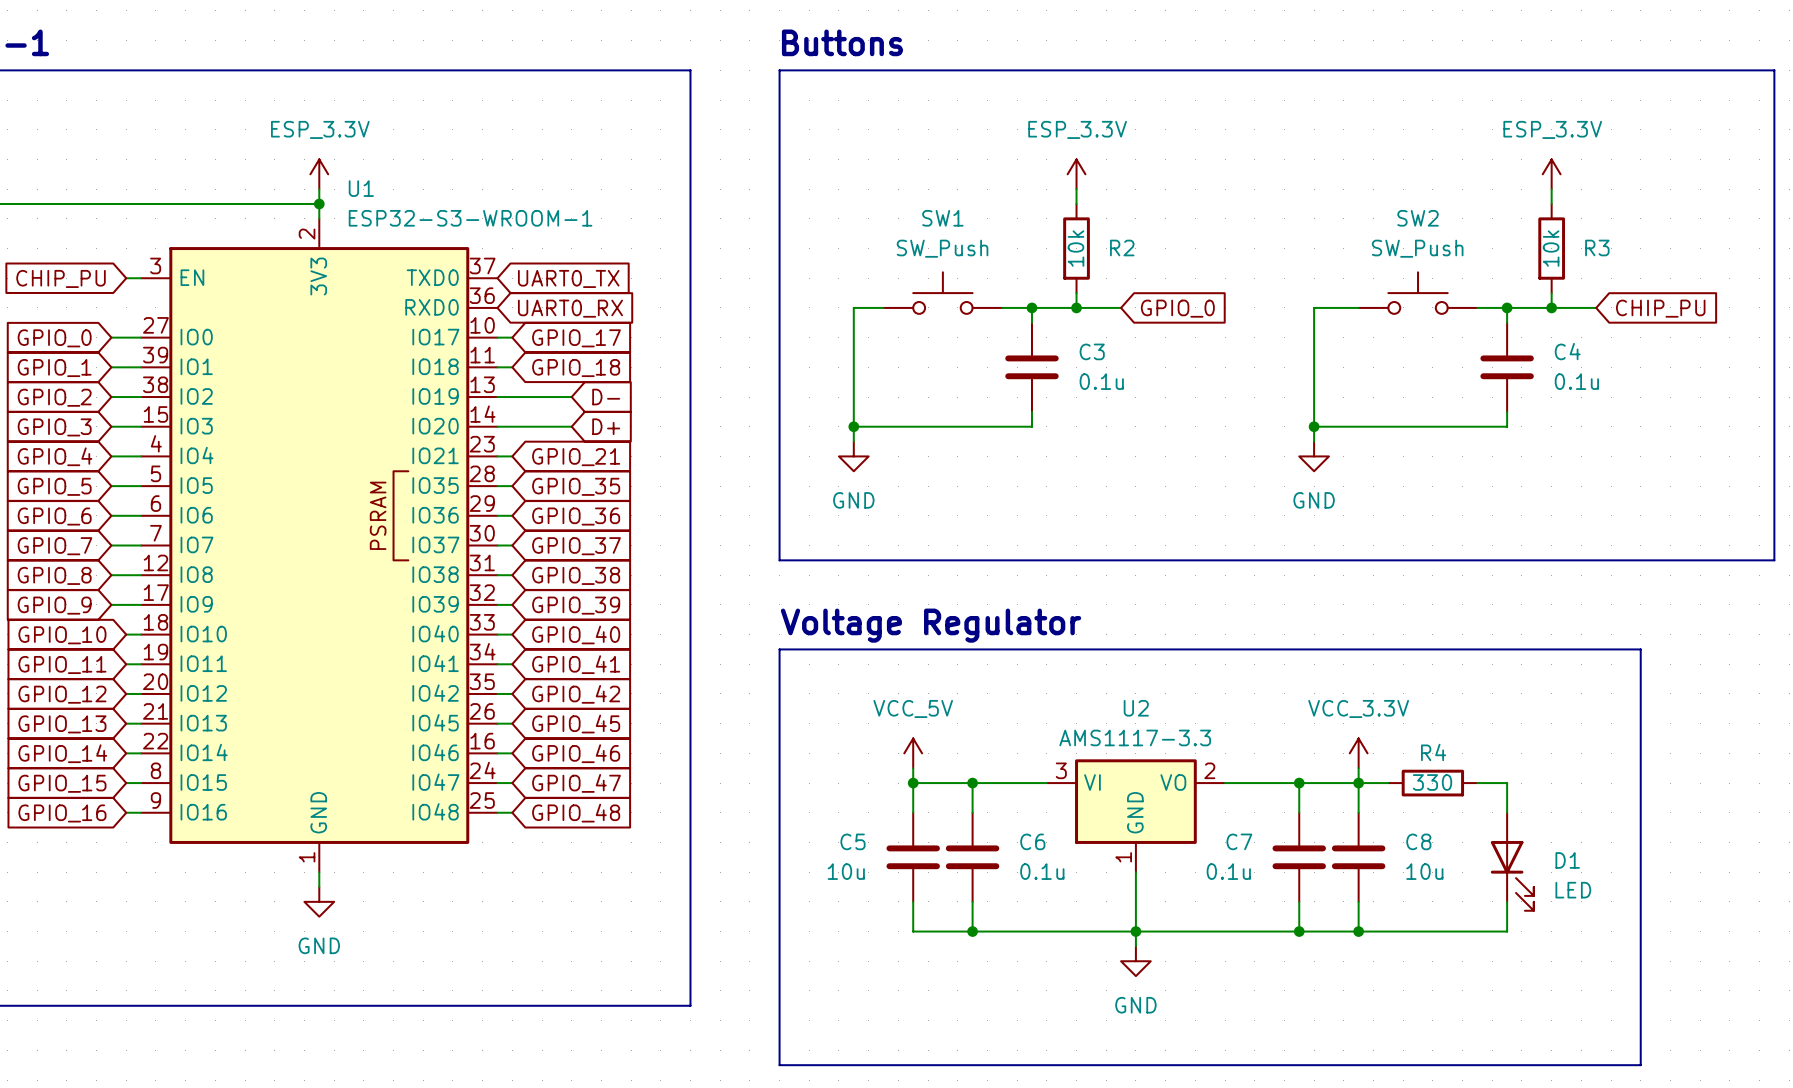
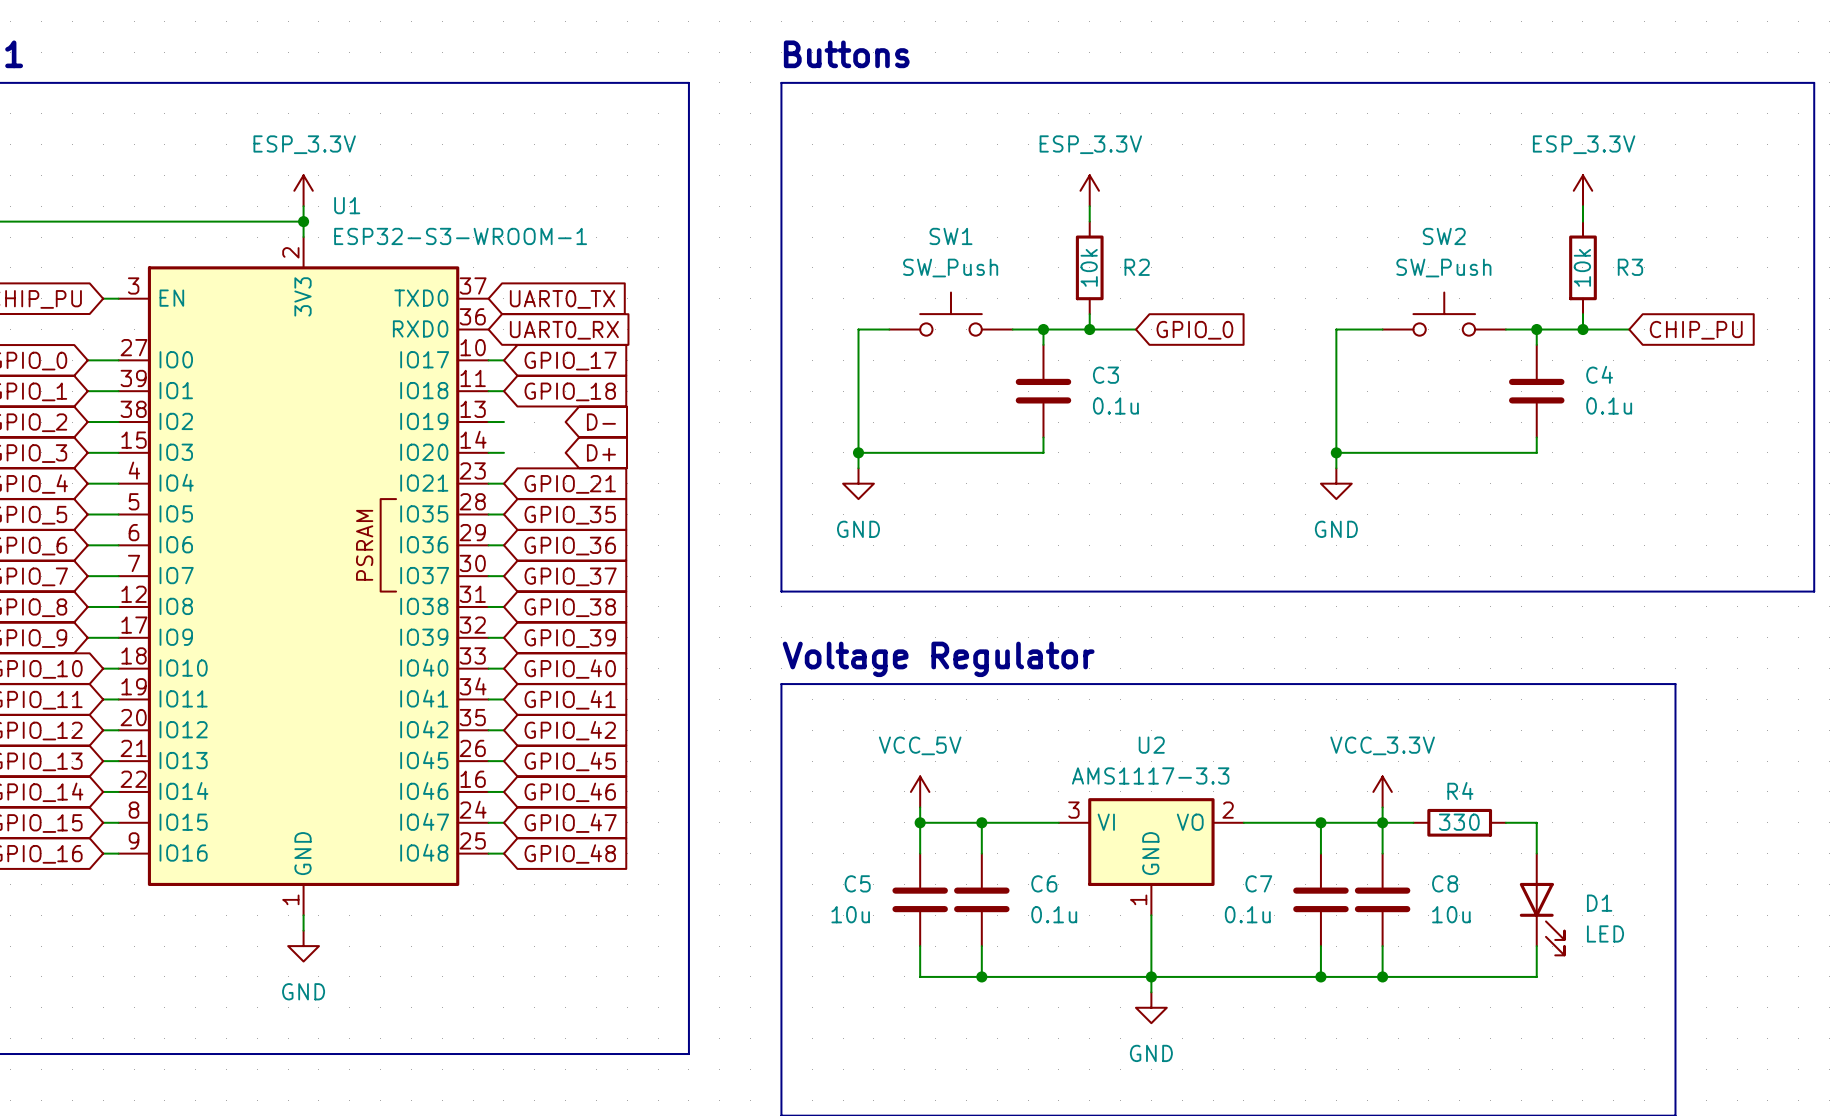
wire: (512, 397) (571, 397) -> none
wire: (512, 426) (571, 426) -> none

